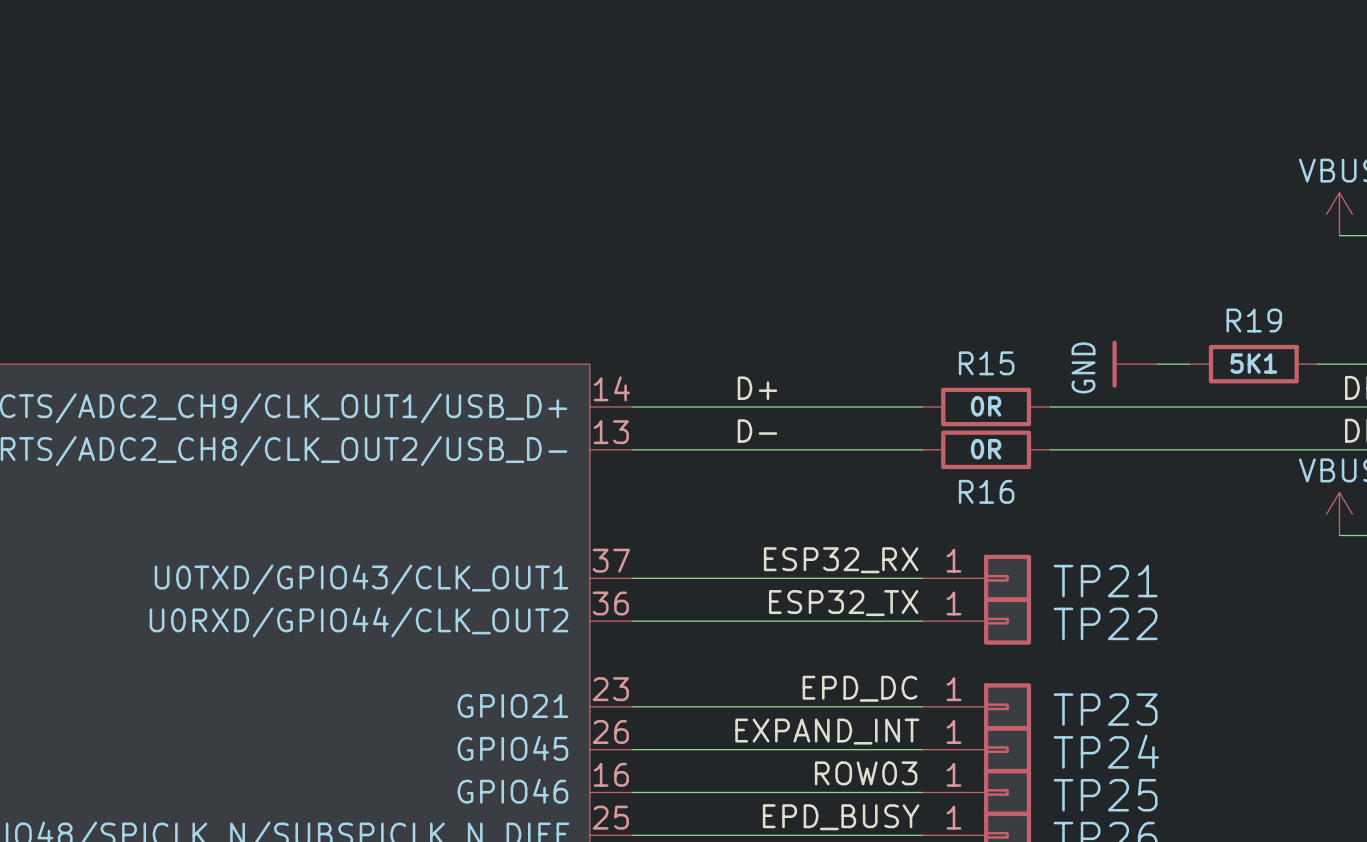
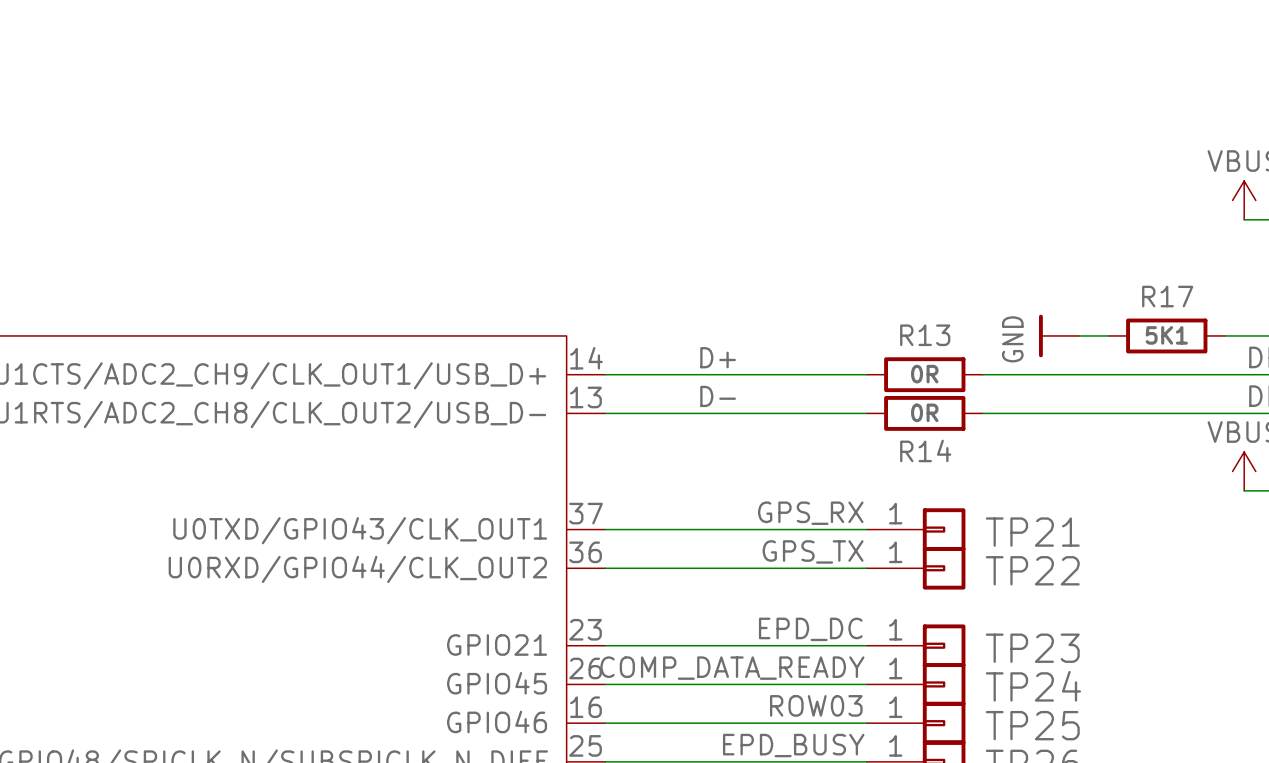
R19 name: R19 (1254, 320) -> R17 (1167, 296)
R15 name: R15 (986, 363) -> R13 (925, 335)
R16 name: R16 (986, 491) -> R14 (925, 450)
label: ESP32_RX (841, 560) -> GPS_RX (810, 513)
label: ESP32_TX (843, 603) -> GPS_TX (813, 551)
label: EXPAND_INT (827, 731) -> COMP_DATA_READY (732, 668)

